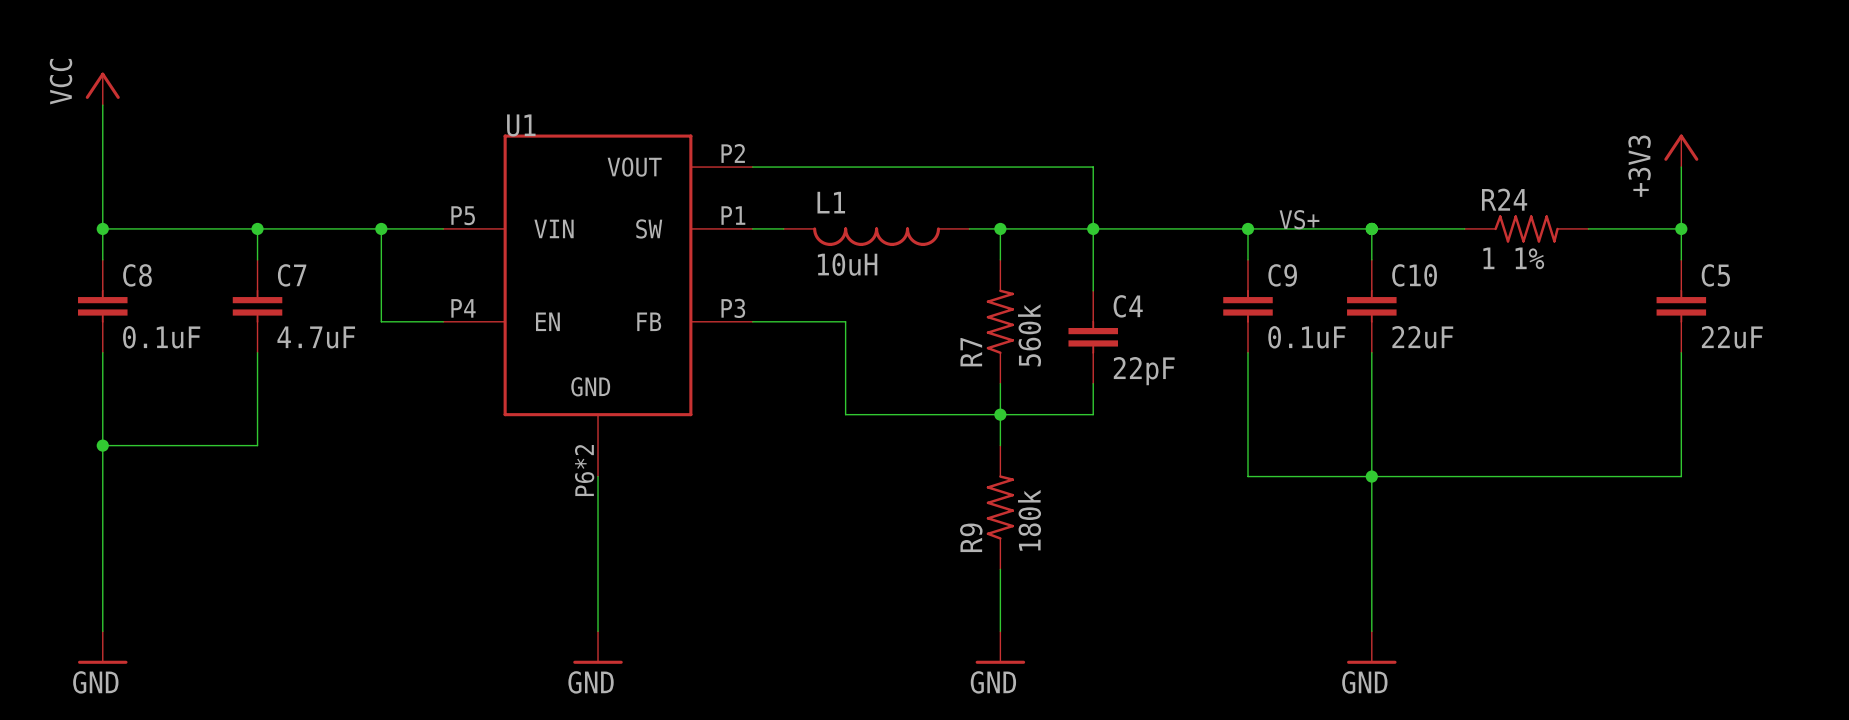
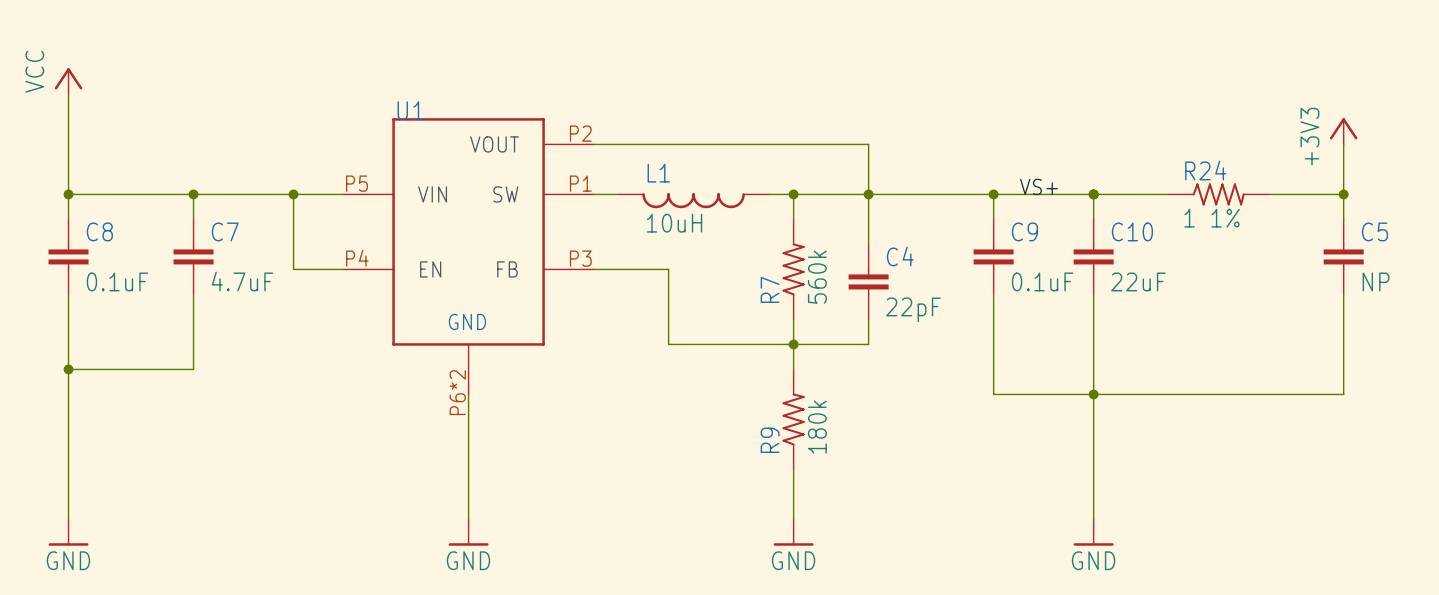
C5 value: 22uF (1732, 337) -> NP (1376, 281)

